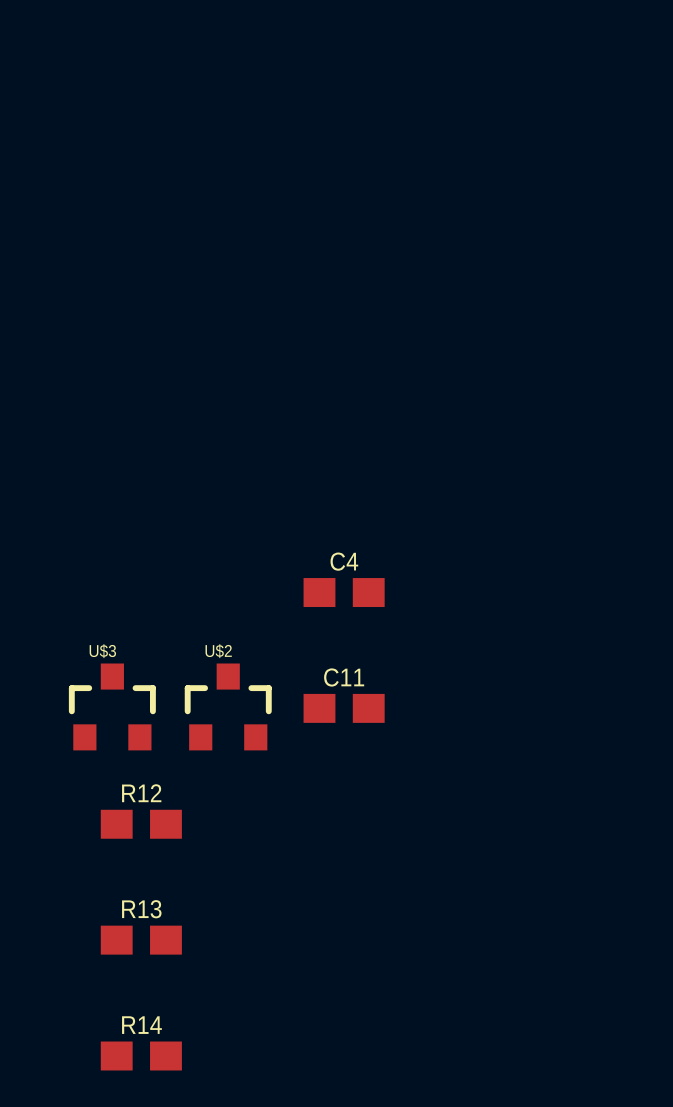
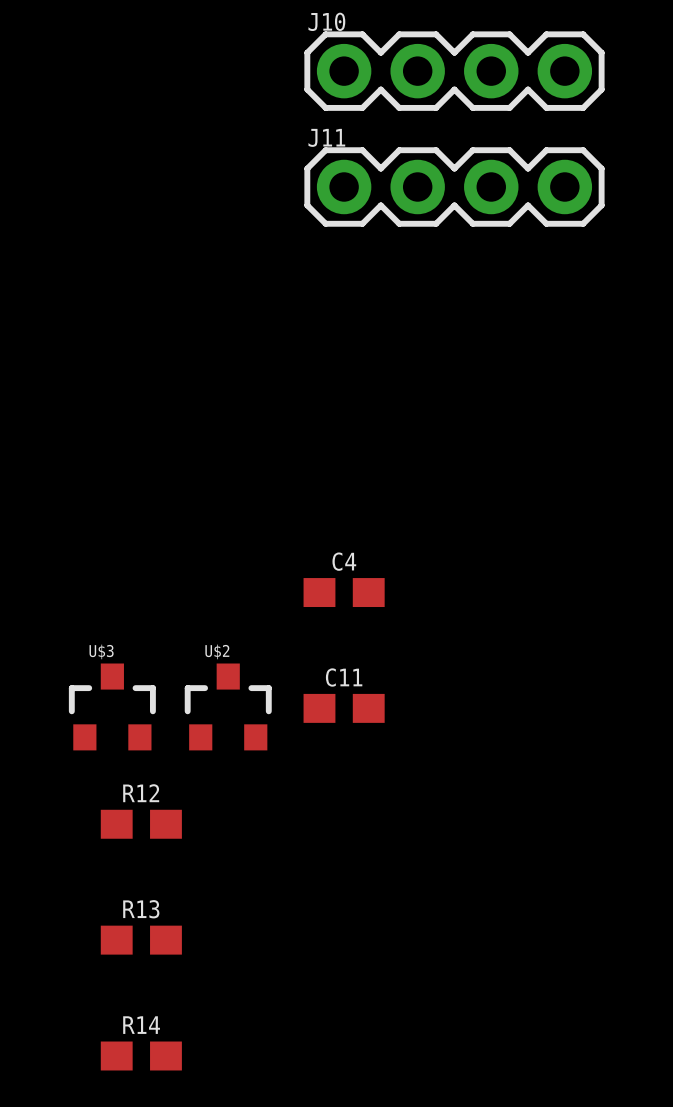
J10: none -> (454, 71)
J11: none -> (454, 187)

